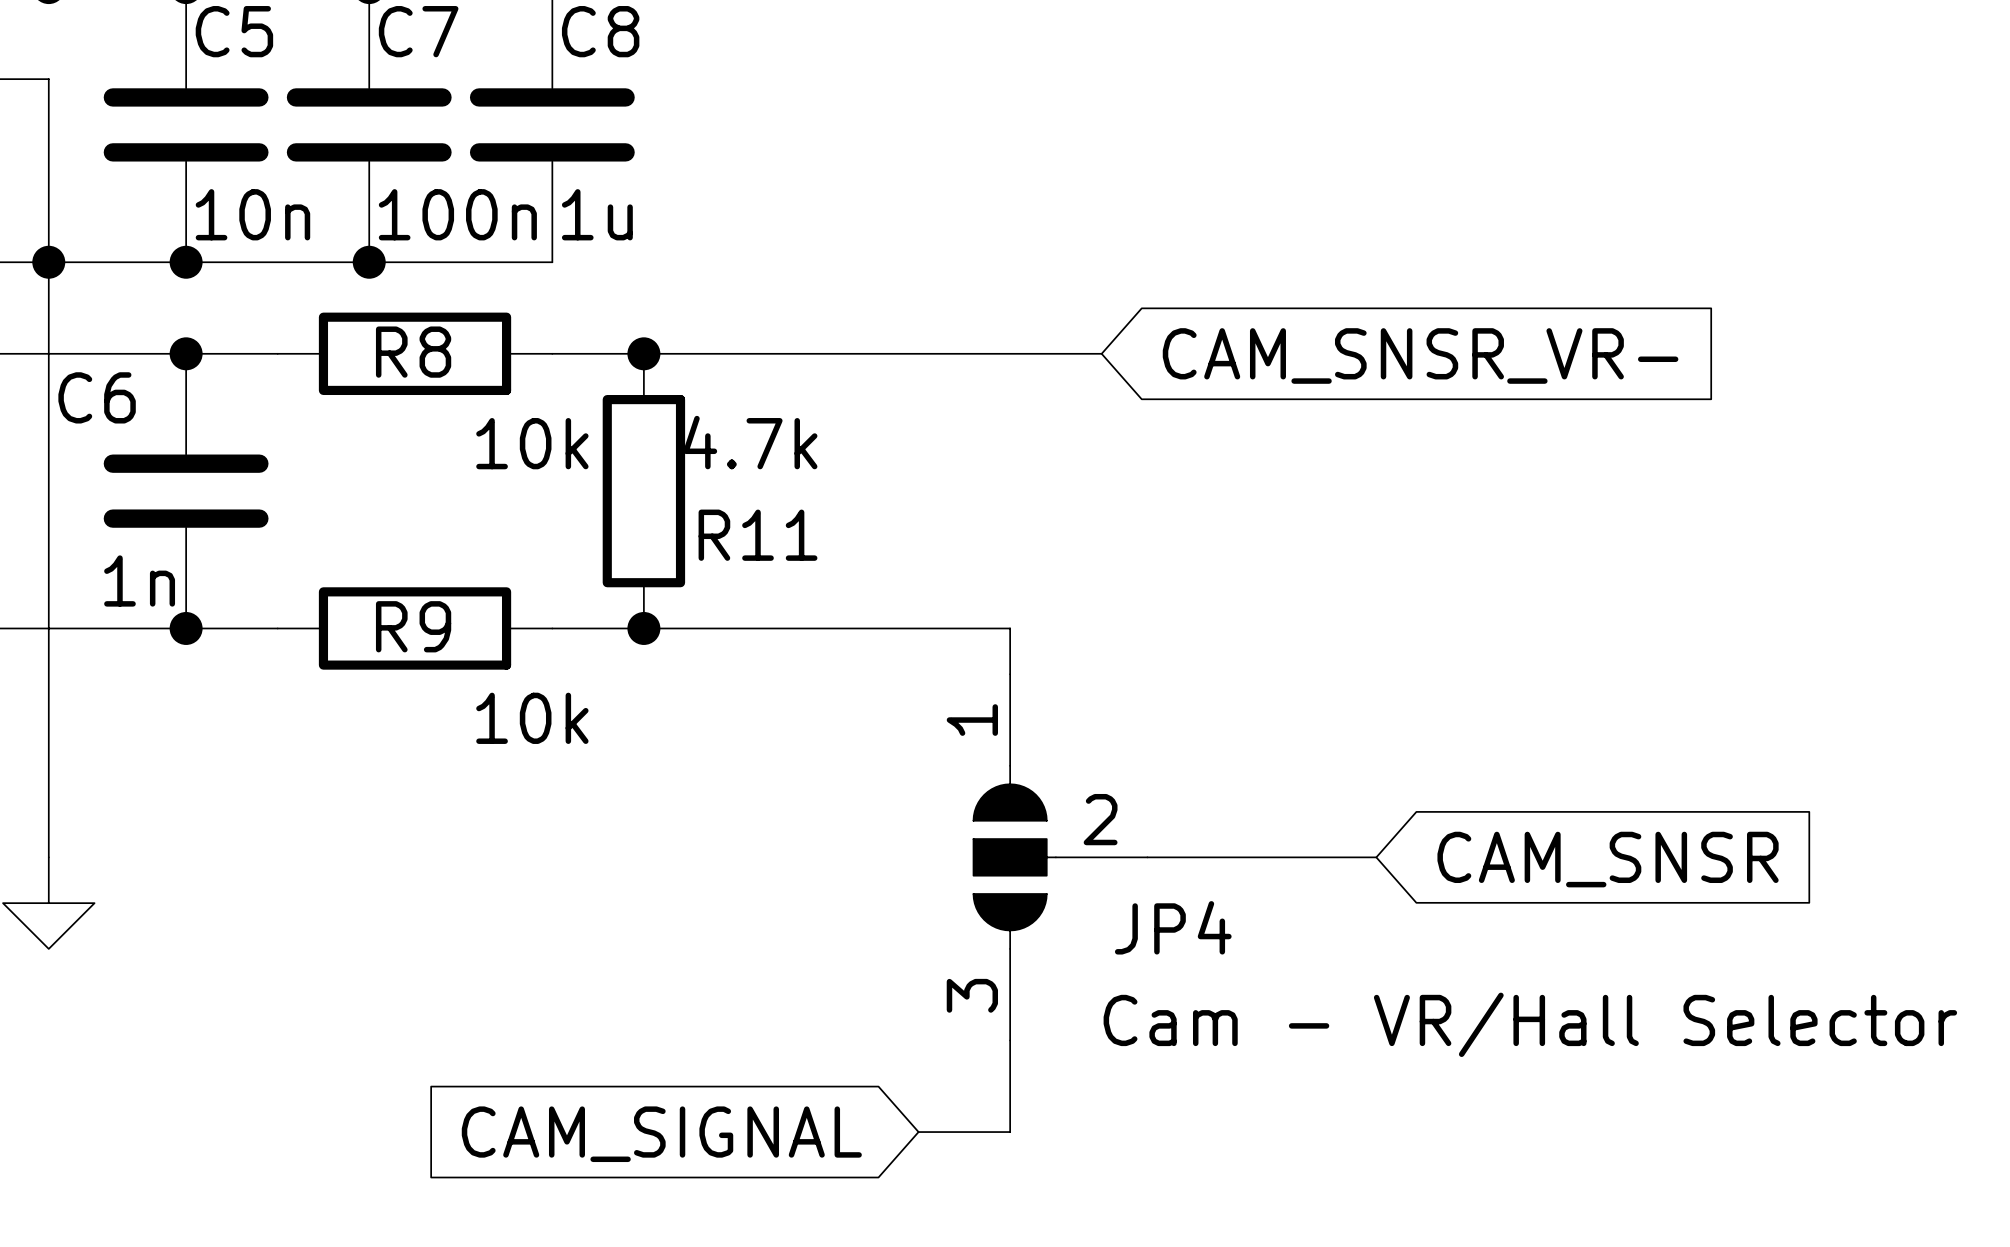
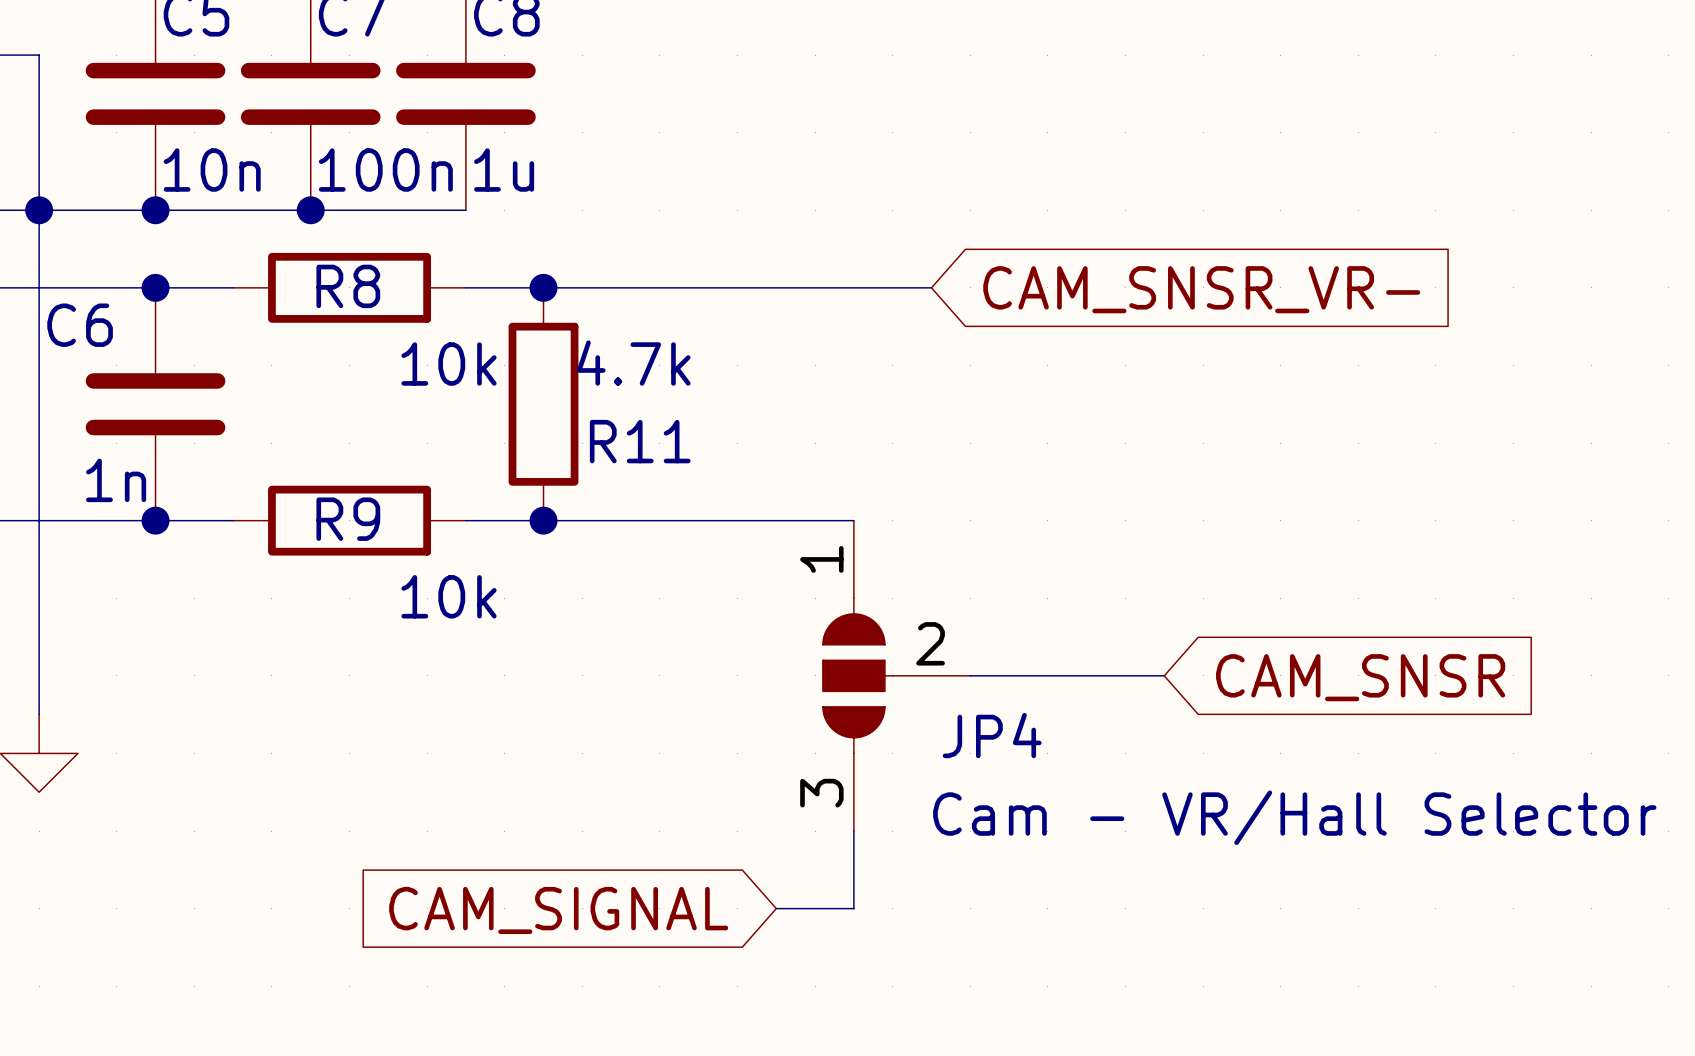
JP4 position: (1060, 857) -> (896, 675)
wire: (1147, 857) (1376, 857) -> (970, 675) (1164, 675)
global label position: CAM_SNSR (1608, 859) -> CAM_SNSR (1360, 677)
wire: (1010, 1086) (1010, 1132) (918, 1132) -> (853, 908) (776, 908)
global label position: CAM_SIGNAL (661, 1134) -> CAM_SIGNAL (558, 910)

